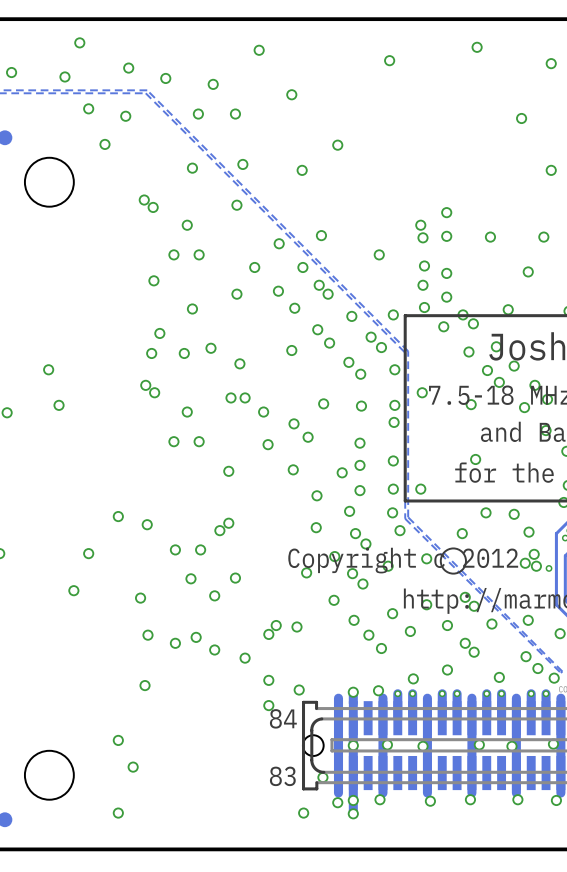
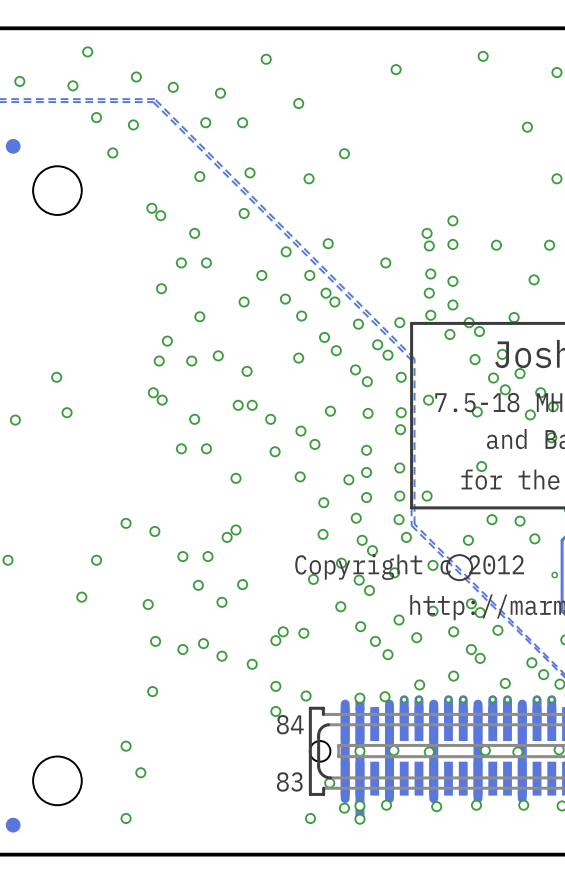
via: (534, 554) -> none
via: (525, 563) -> none
via: (536, 566) -> none
via: (528, 620) -> none

